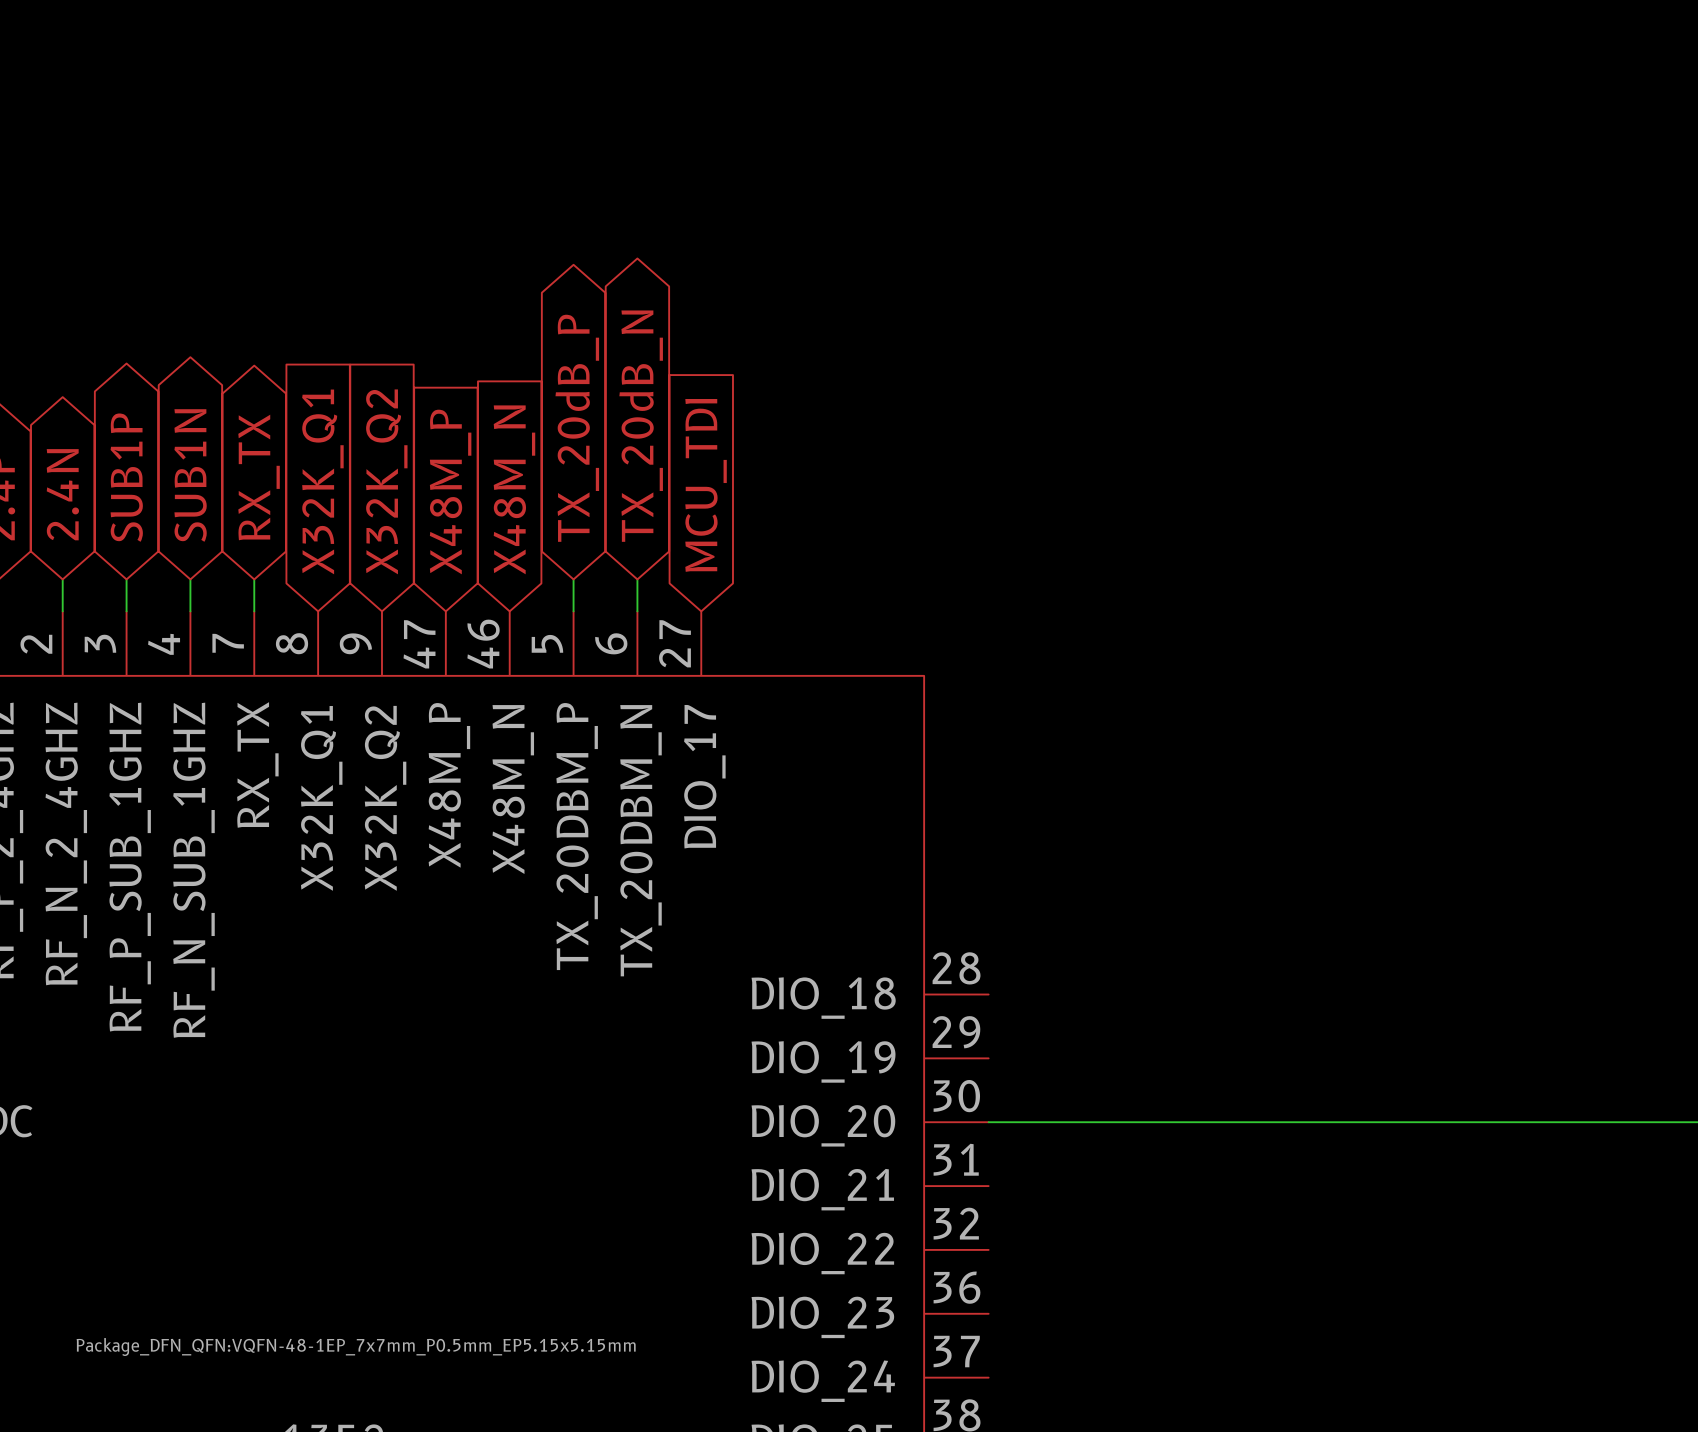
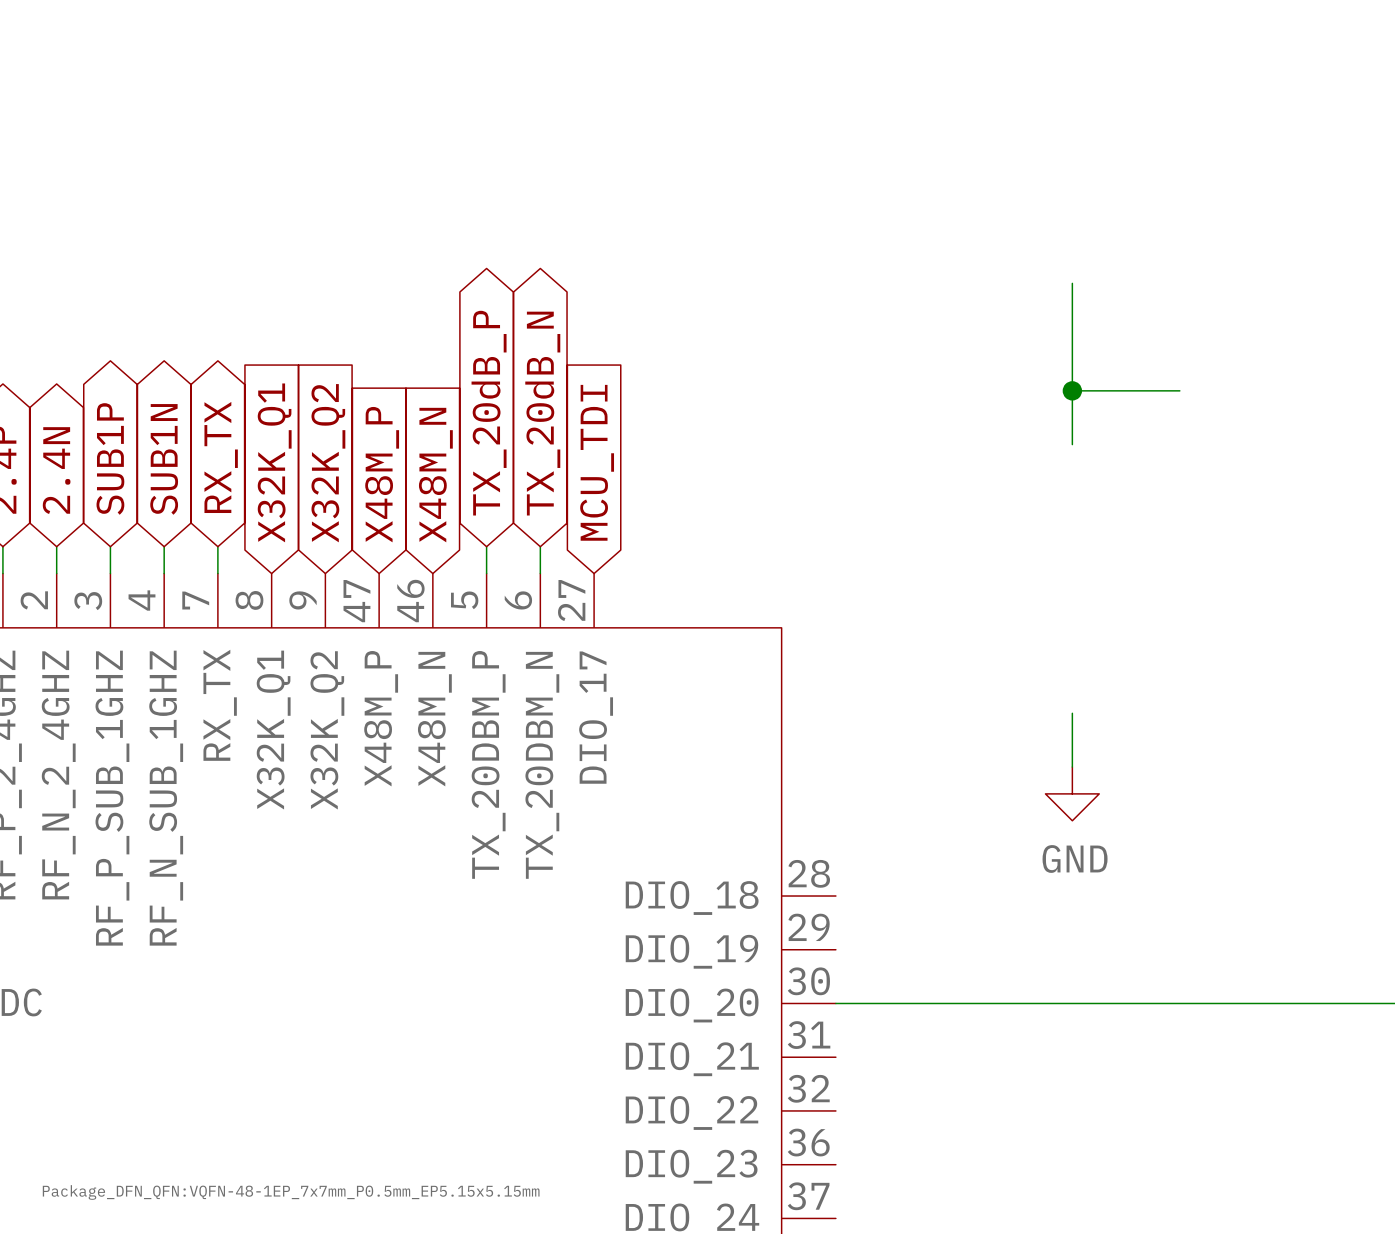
wire: none -> (1072, 283) (1072, 444)
wire: none -> (1072, 390) (1179, 390)
junction: none -> (1072, 390)
wire: none -> (1072, 713) (1072, 767)
power symbol: none -> GND (1072, 793)

